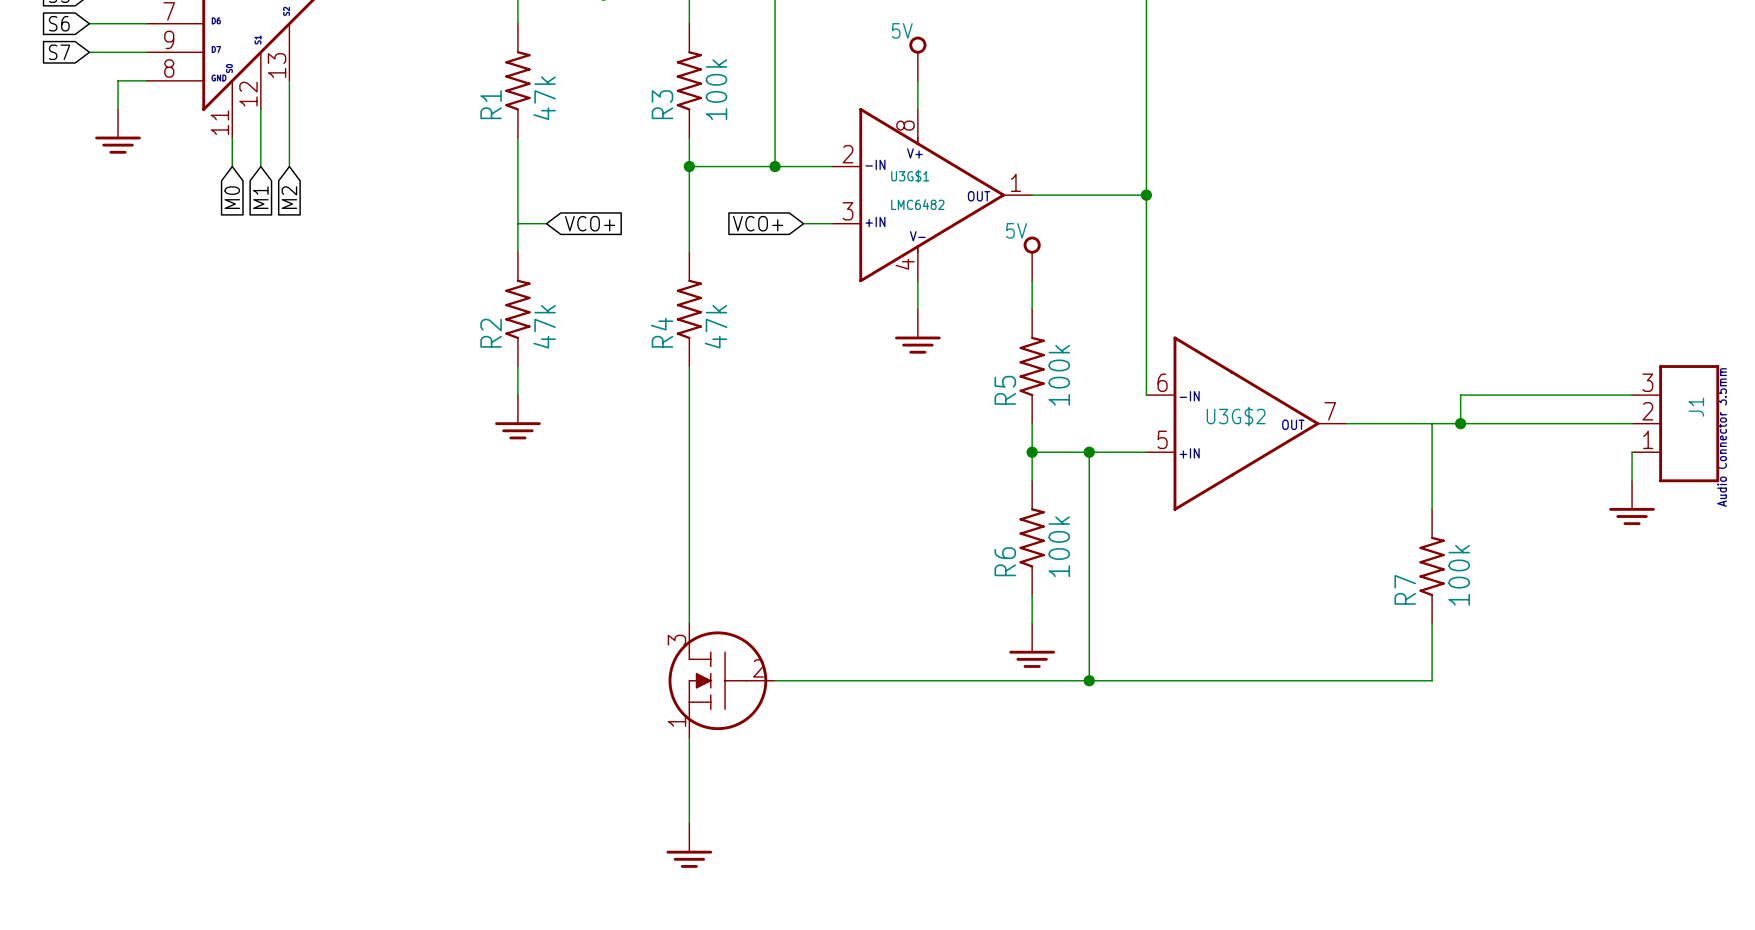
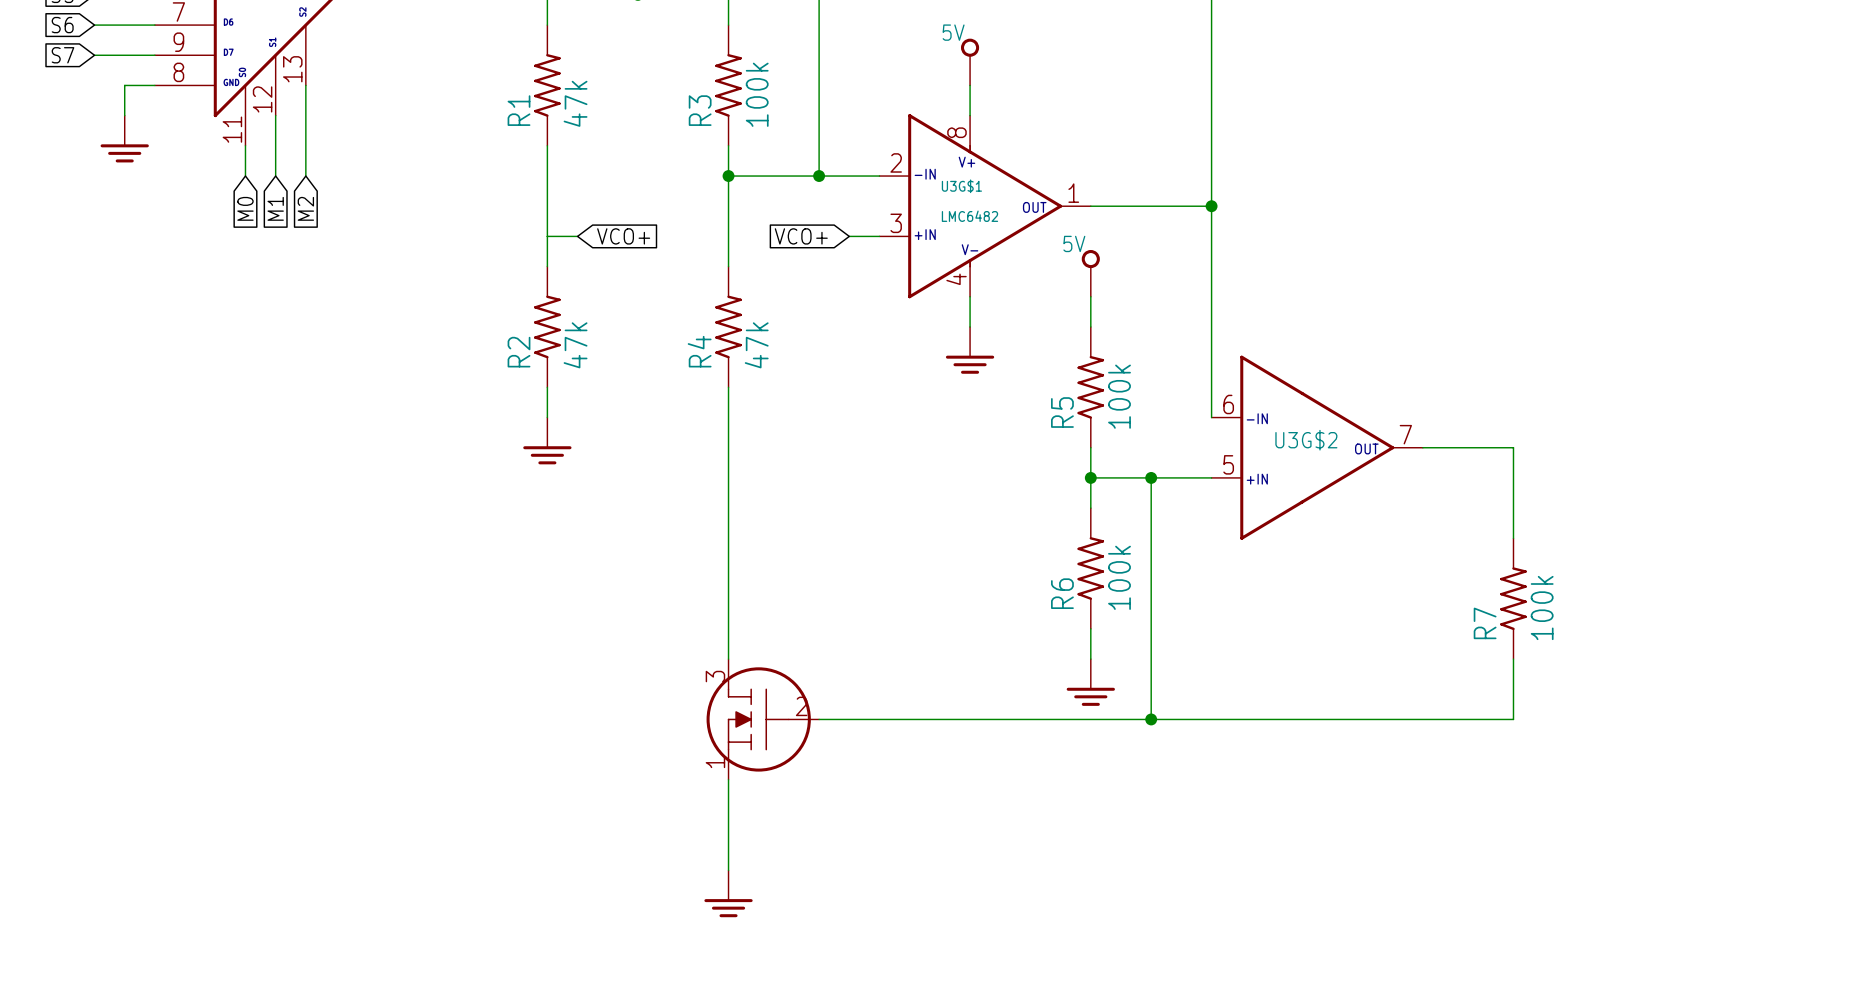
wire: (1632, 395) (1460, 395) (1460, 423) -> none
wire: (1432, 423) (1632, 423) -> none
junction: (1460, 423) -> none
J1: (1675, 423) -> none
wire: (1632, 452) (1632, 480) -> none
power symbol: (1632, 502) -> none

